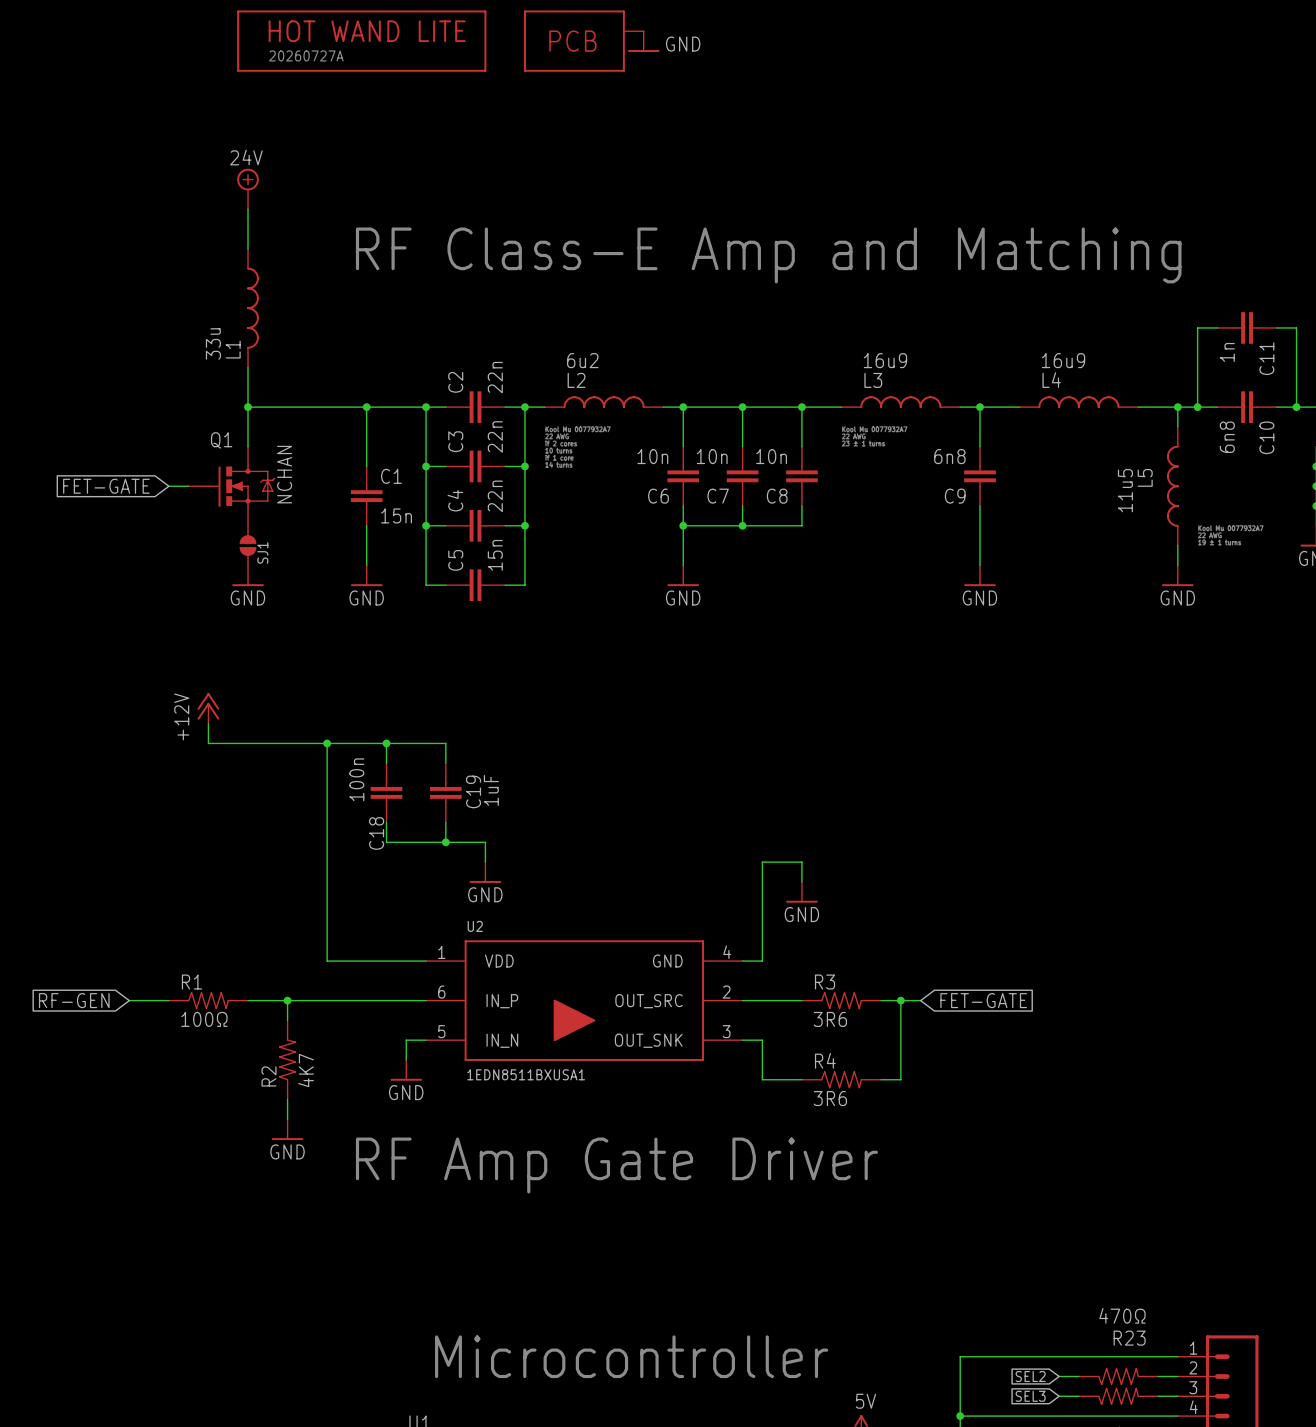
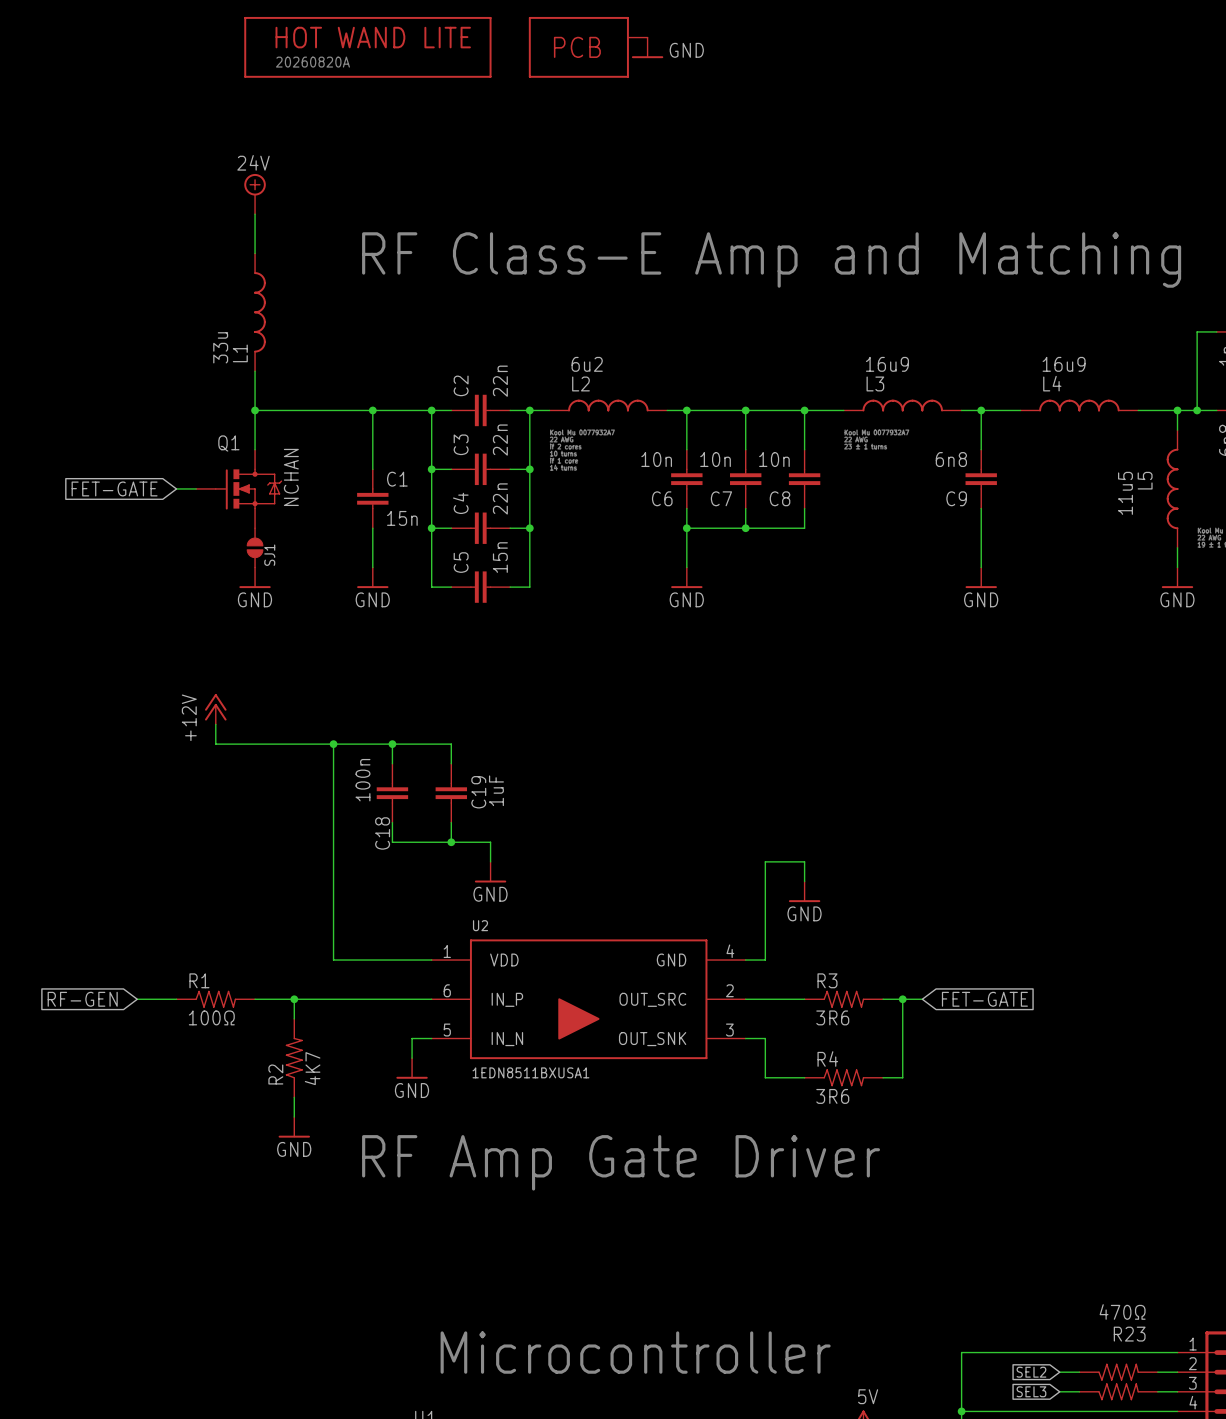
part text: 20260727A (306, 55) -> 20260820A (312, 62)

